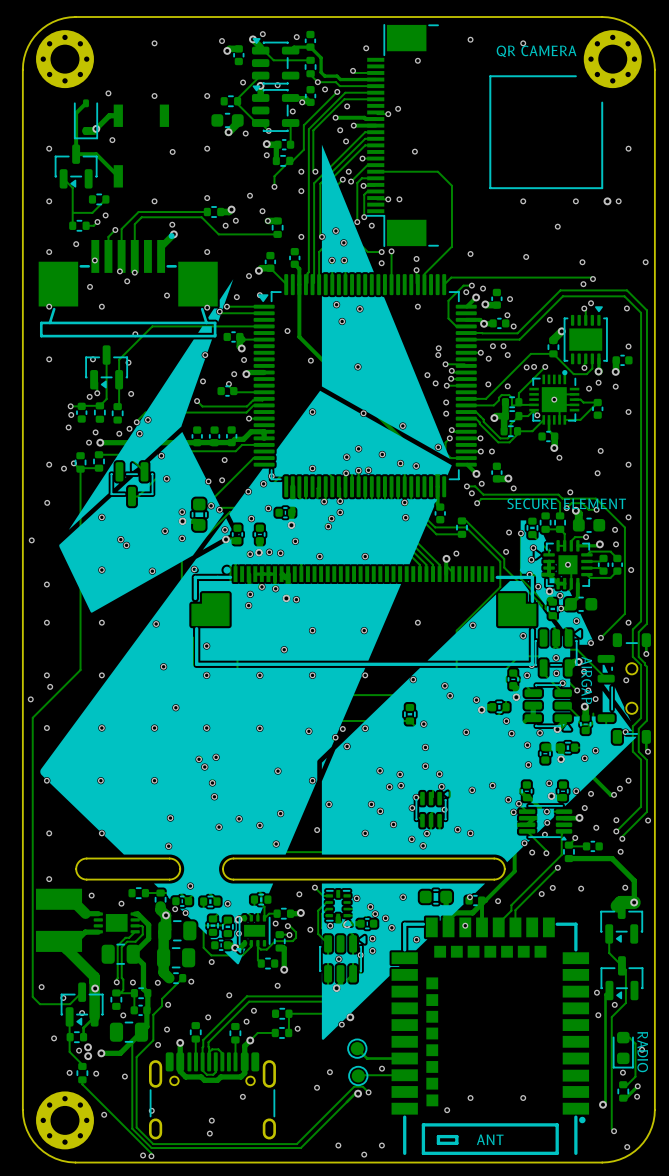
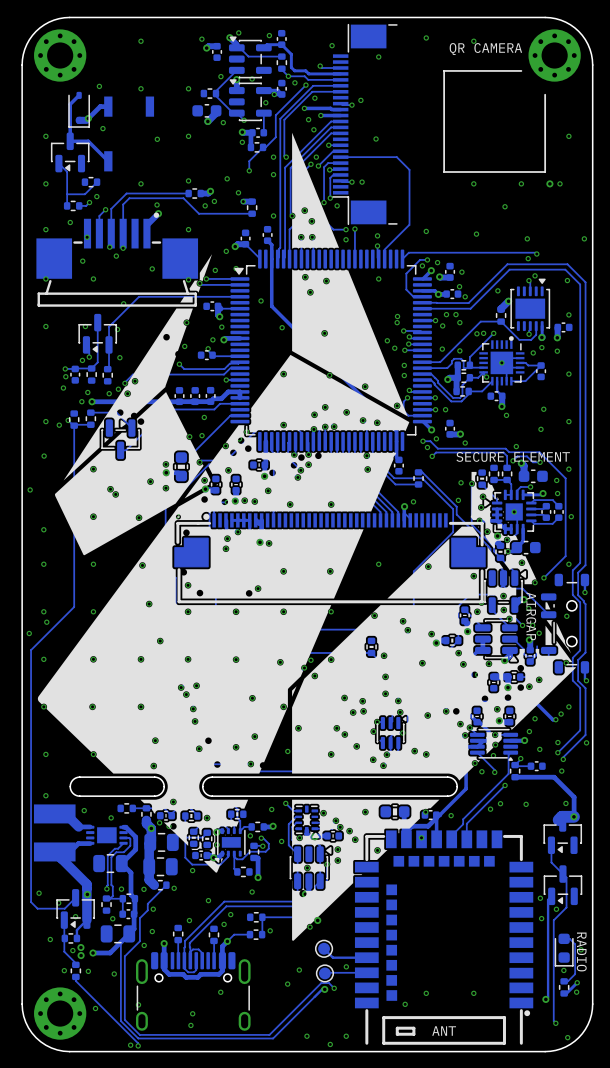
drawing shape: [68, 339, 213, 530] -> [63, 308, 193, 481]
drawing shape: [59, 431, 224, 613] -> [55, 392, 204, 556]
drawing shape: [40, 468, 438, 945] -> [37, 425, 397, 855]
drawing shape: [197, 580, 402, 661] -> [179, 526, 364, 599]
drawing shape: [321, 667, 637, 863] -> [292, 604, 577, 781]
drawing shape: [321, 883, 486, 1040] -> [292, 799, 440, 941]

